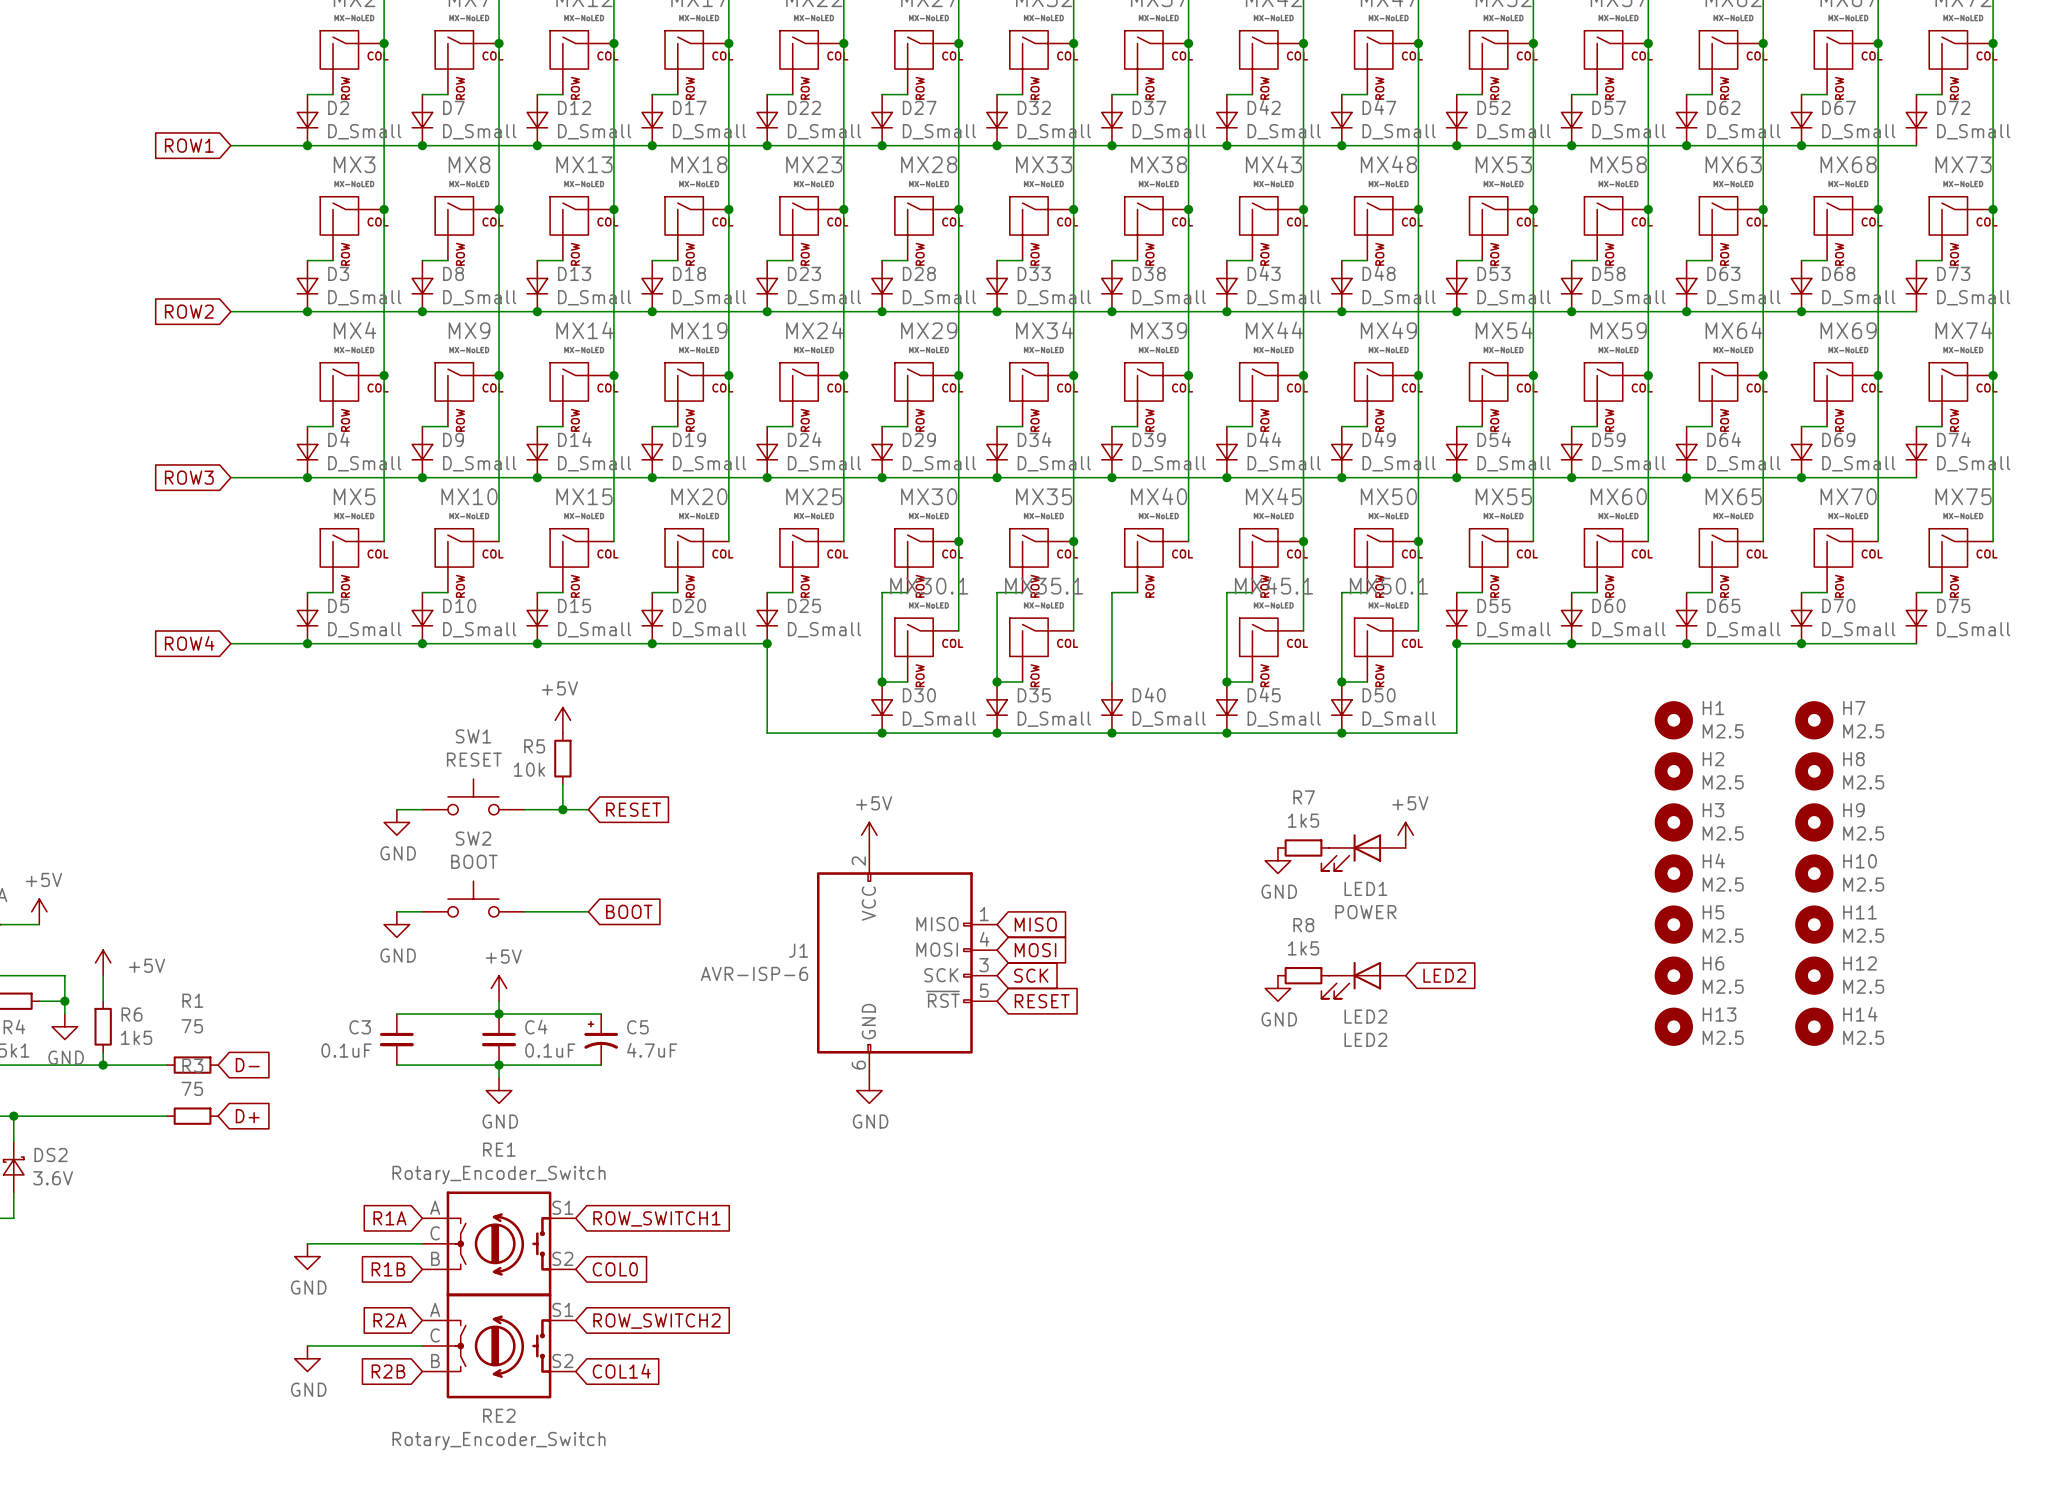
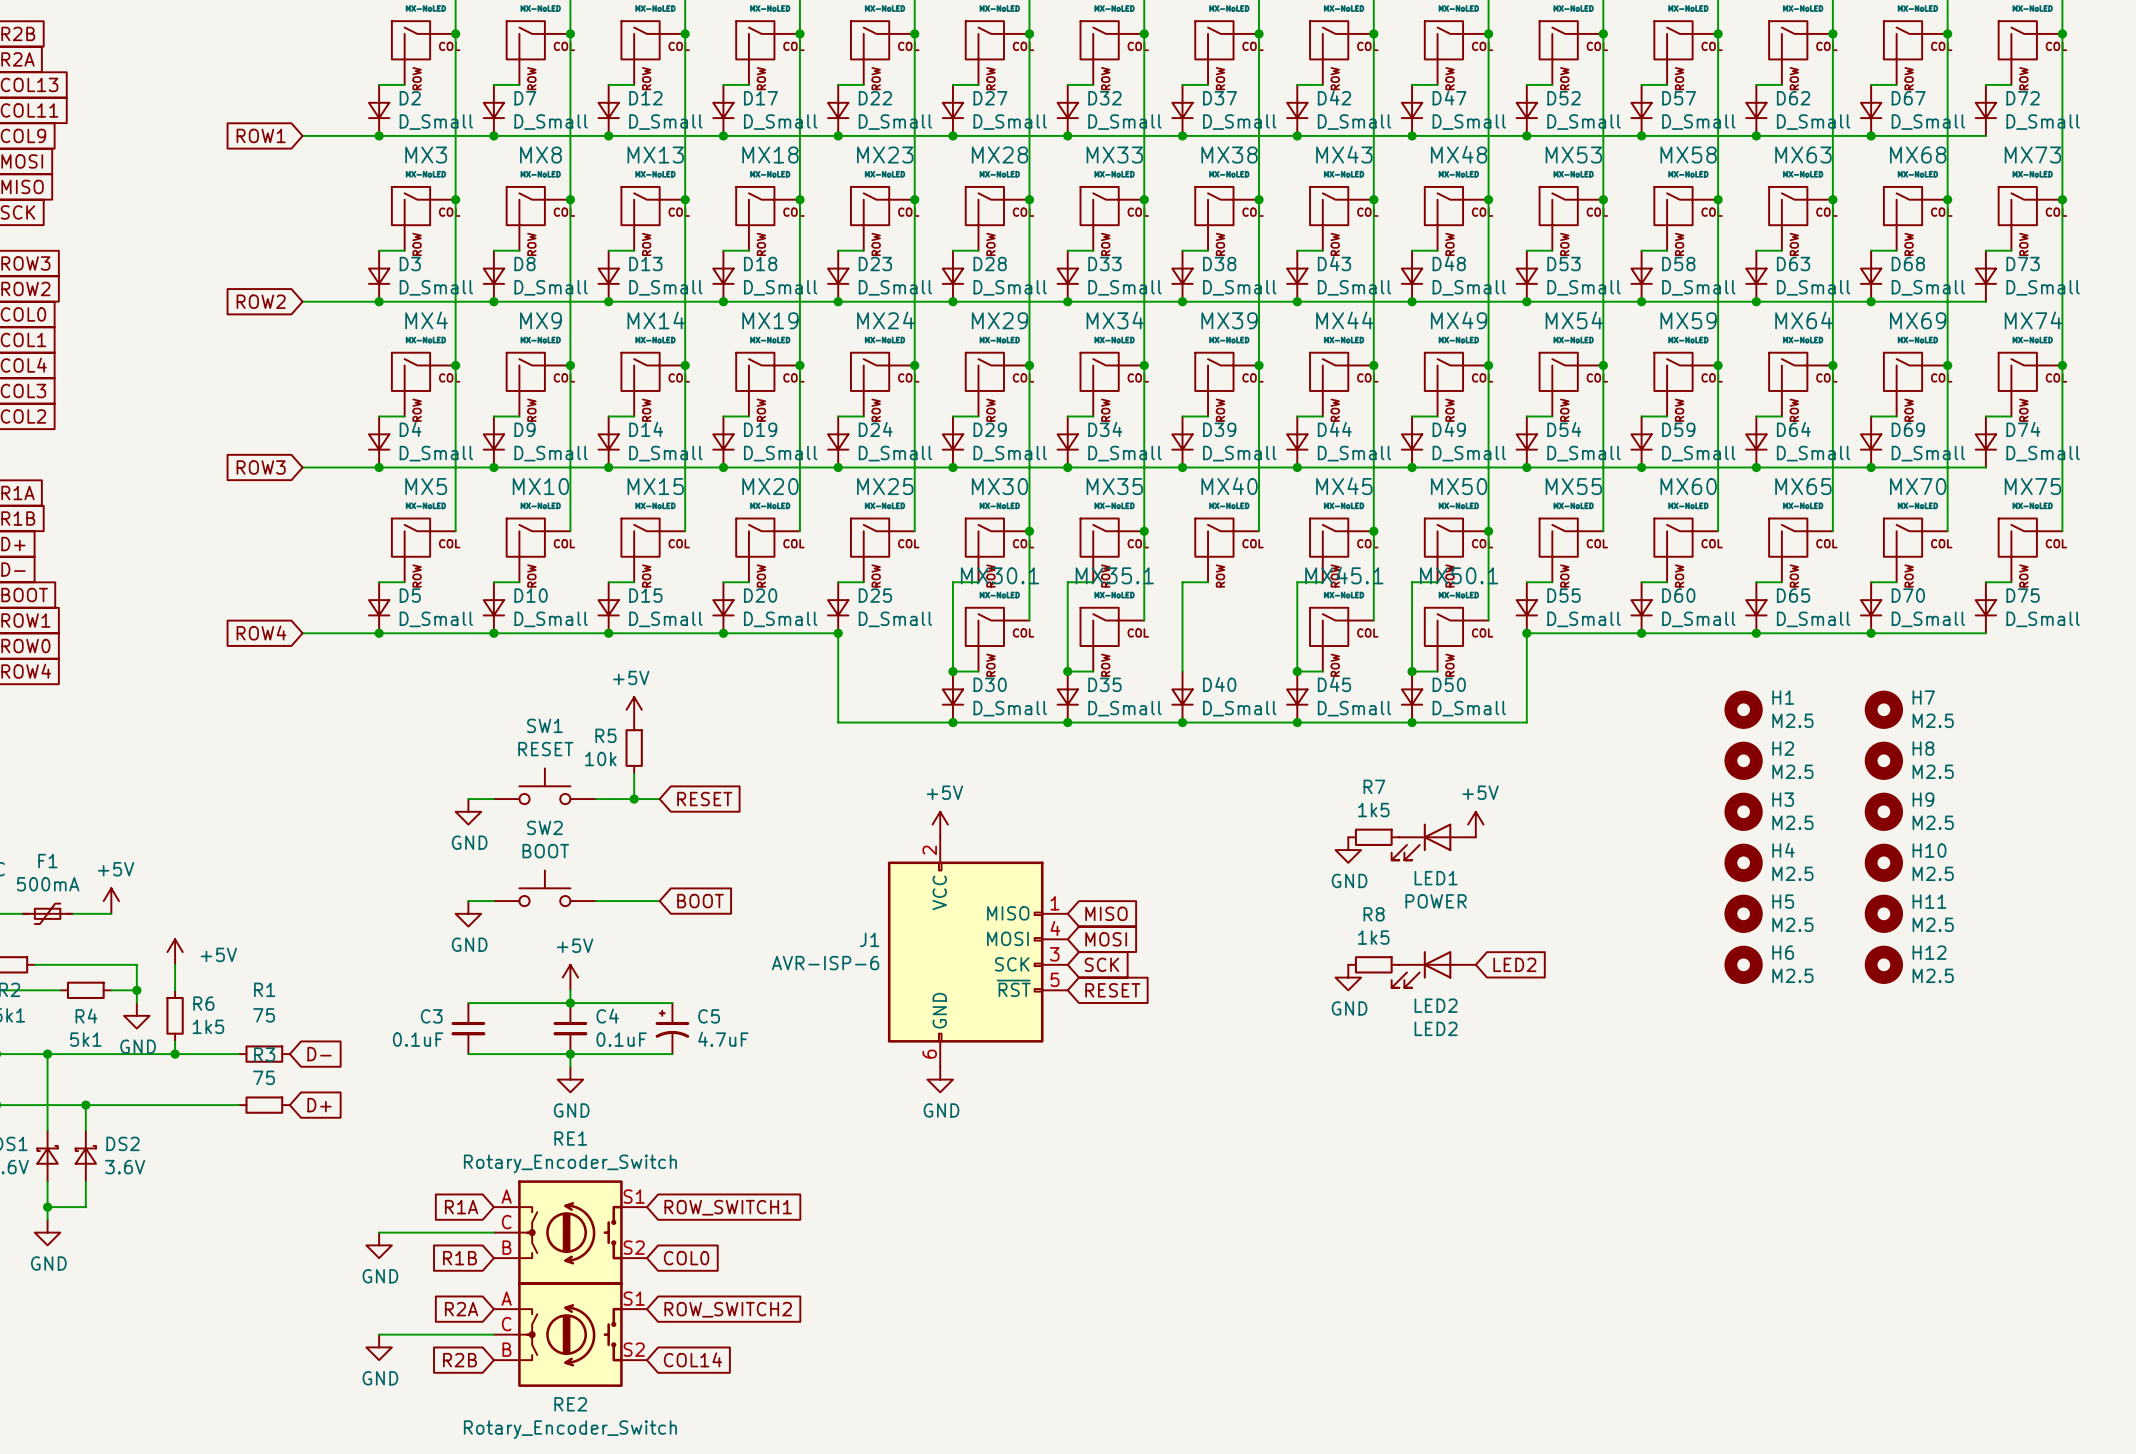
H13: M2.5 (1673, 1026) -> none
H14: M2.5 (1814, 1026) -> none

